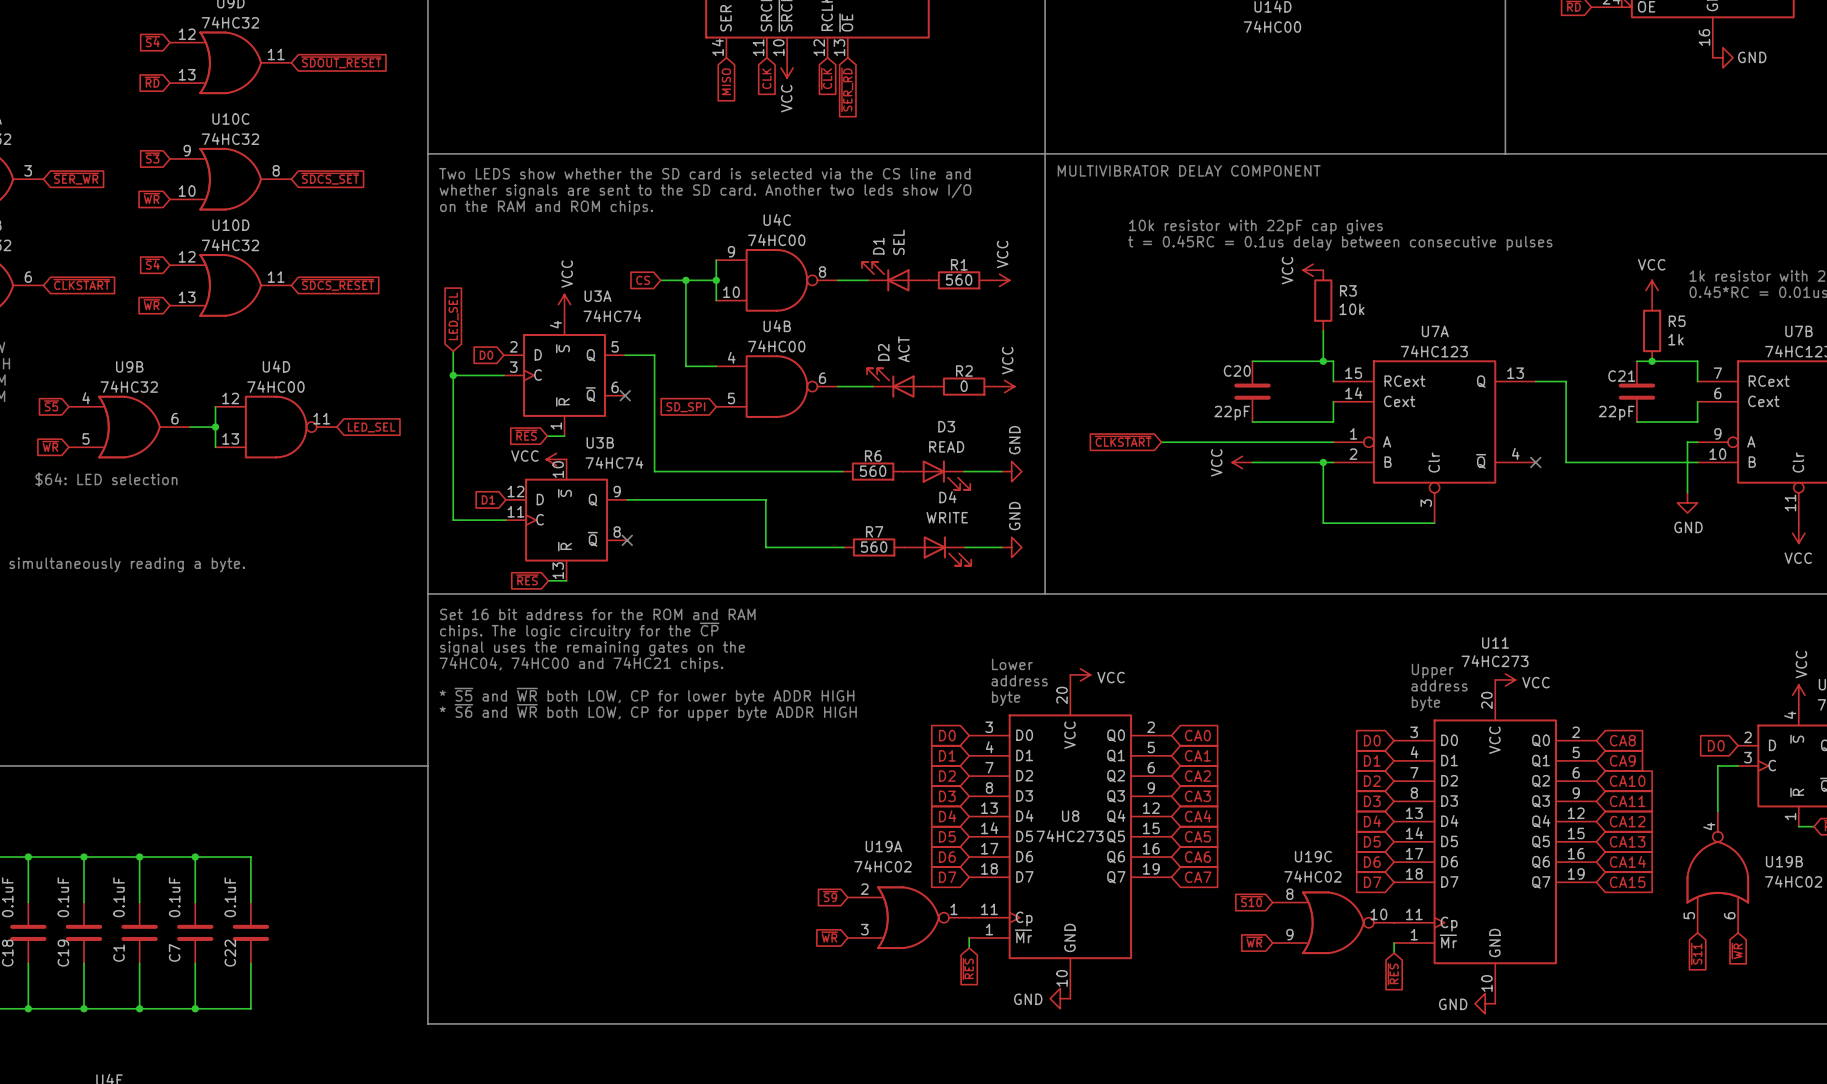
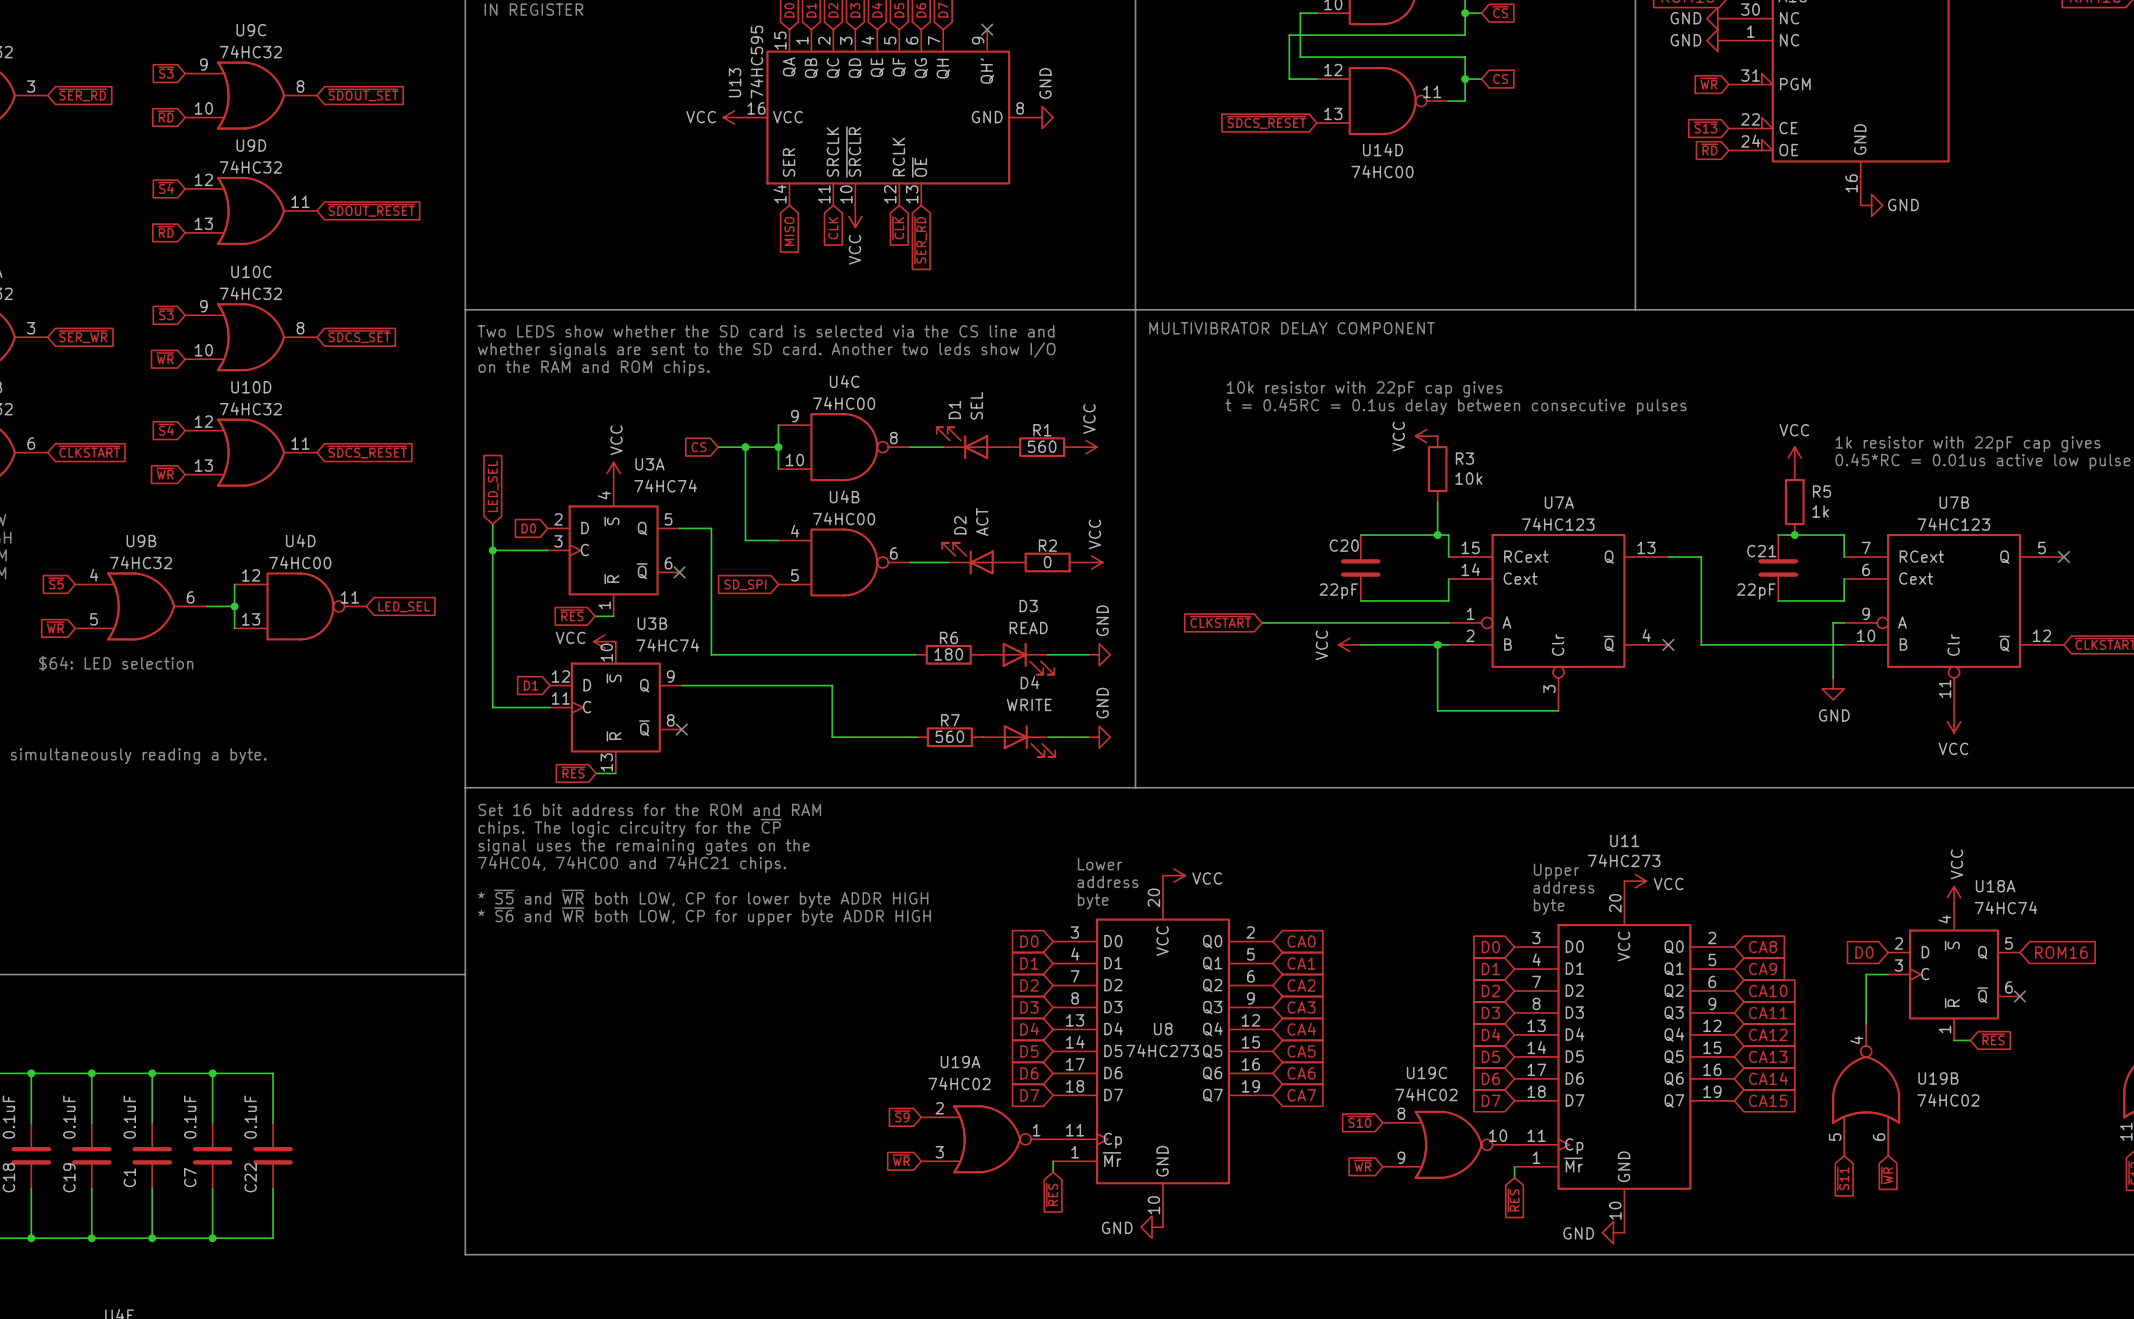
R6 value: 560 (873, 471) -> 180 (948, 654)

